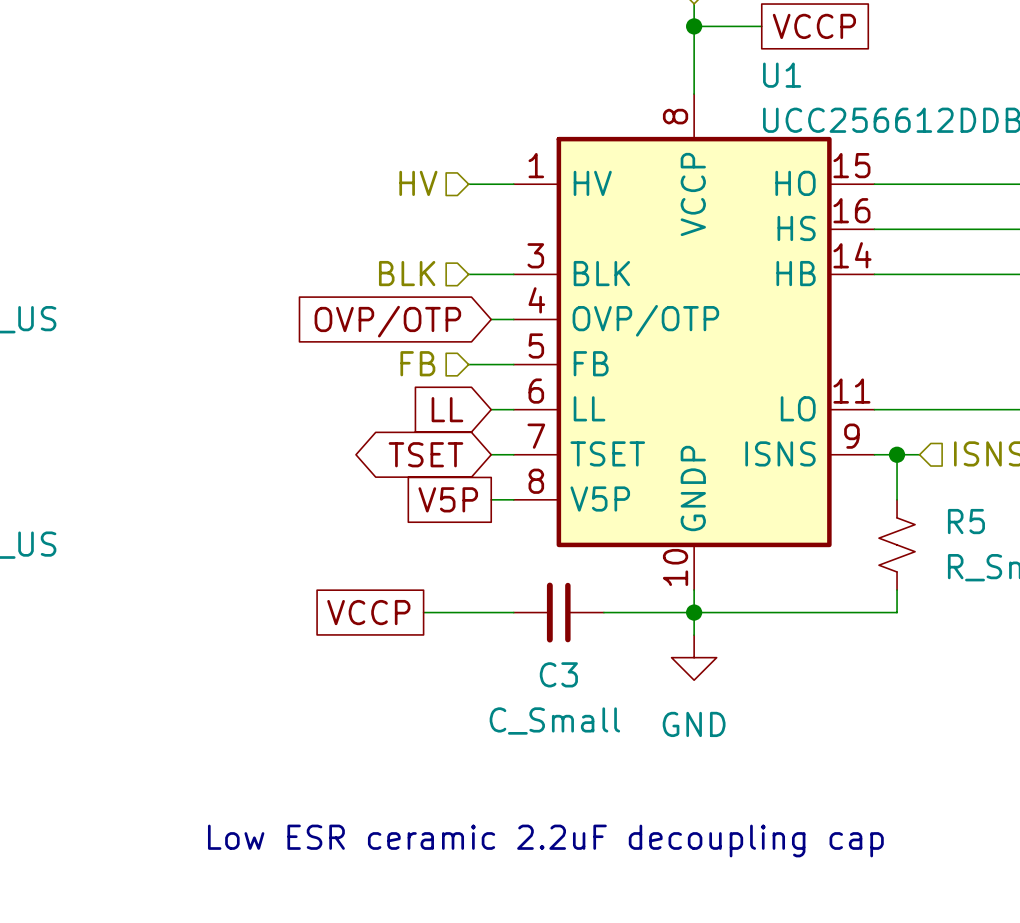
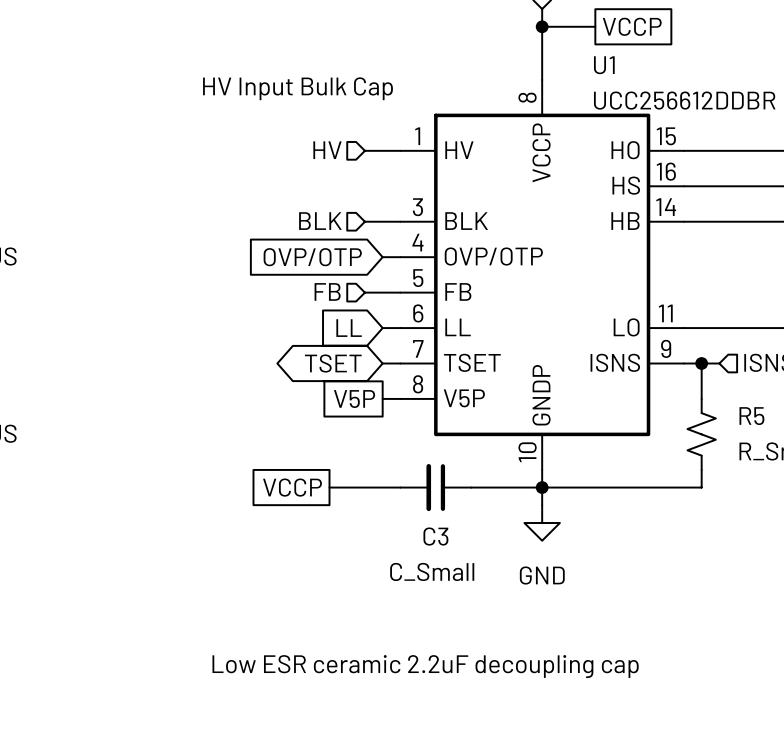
text: none -> HV Input Bulk Cap (297, 88)

